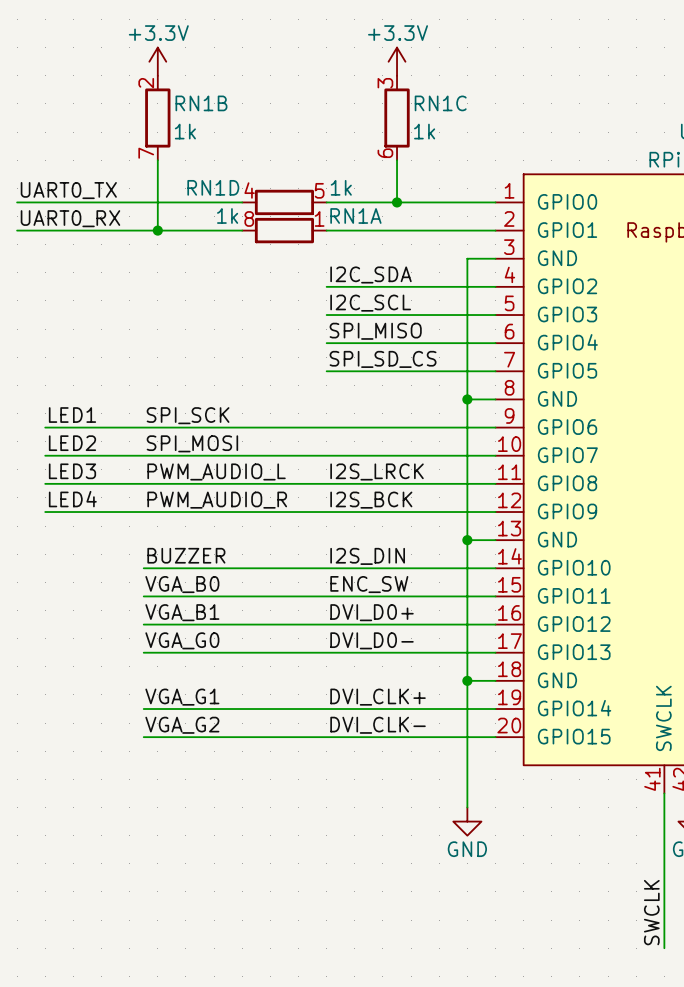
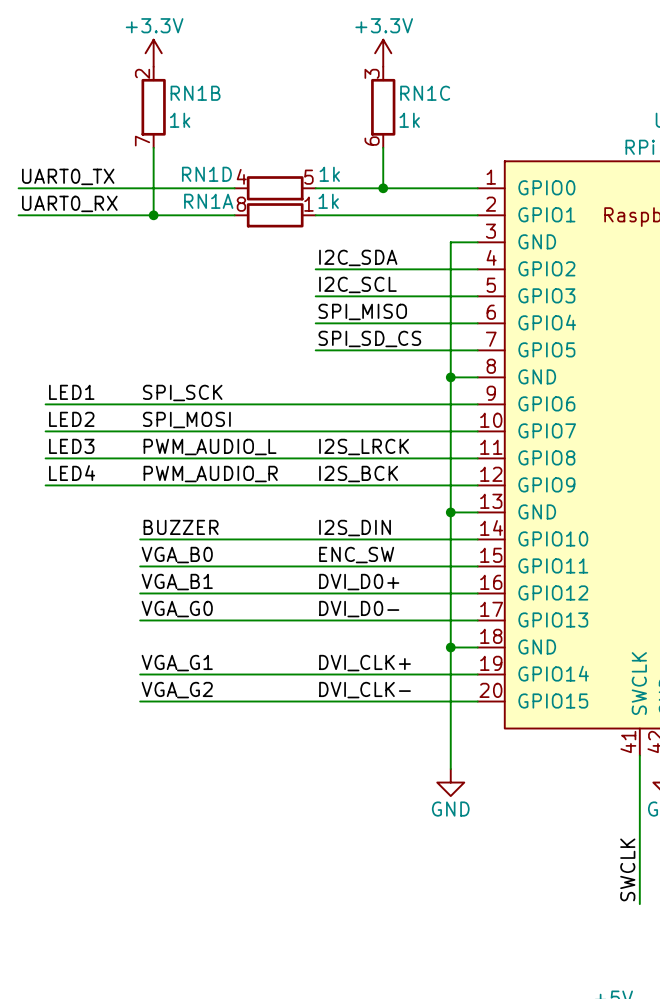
RN1A value position: 1k (227, 215) -> 1k (328, 201)
RN1A name position: RN1A (355, 215) -> RN1A (208, 201)

